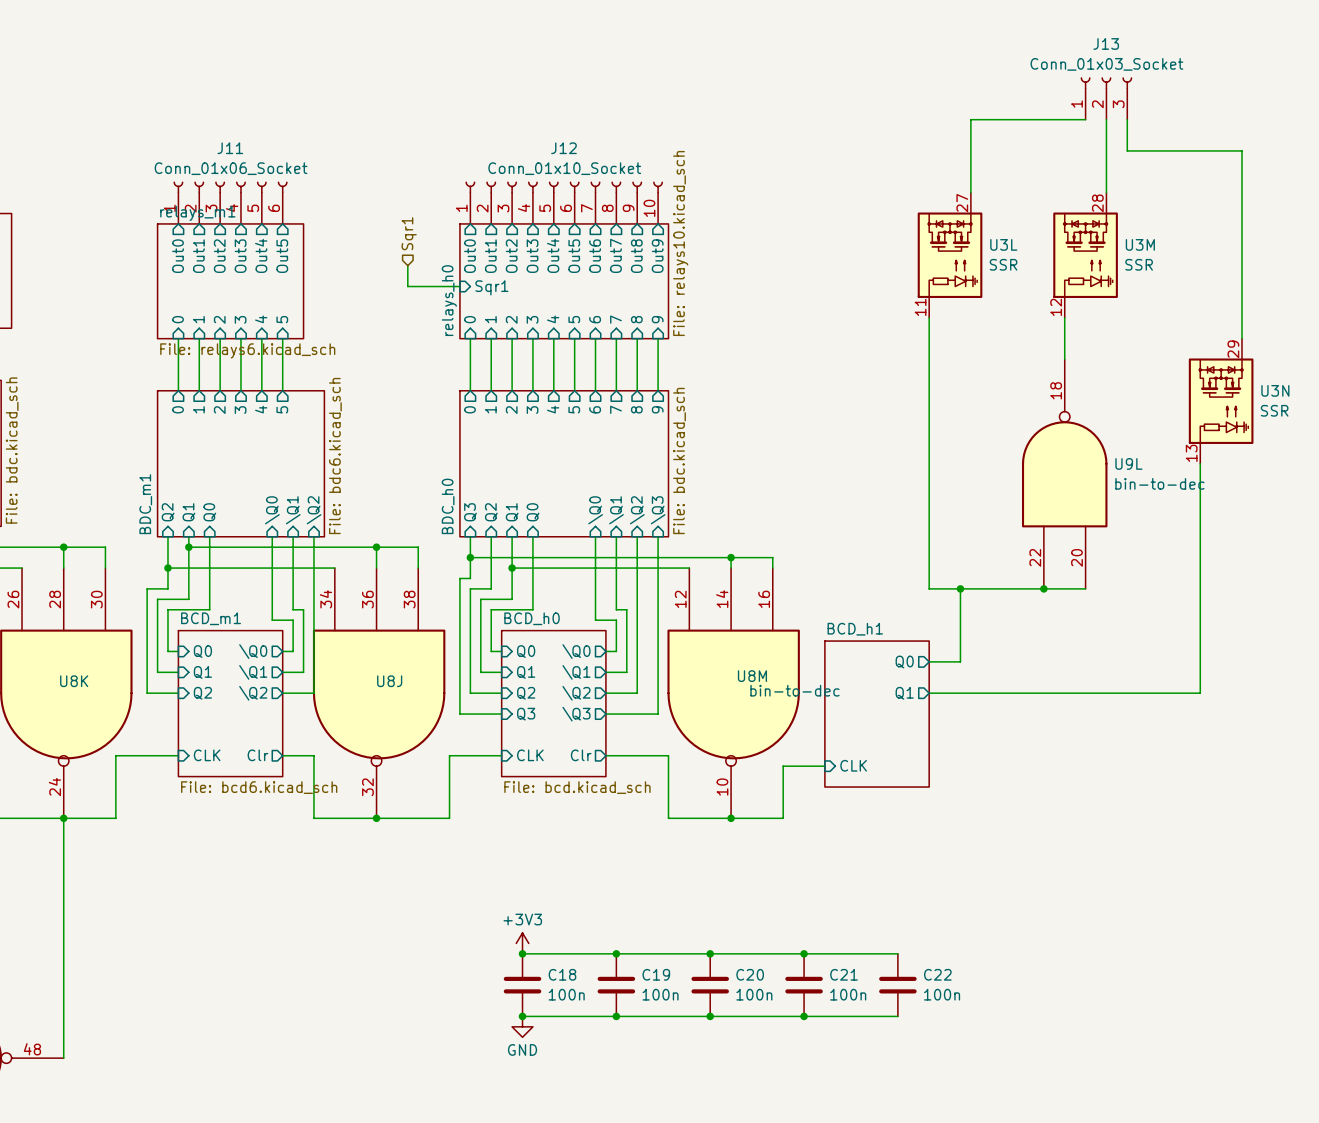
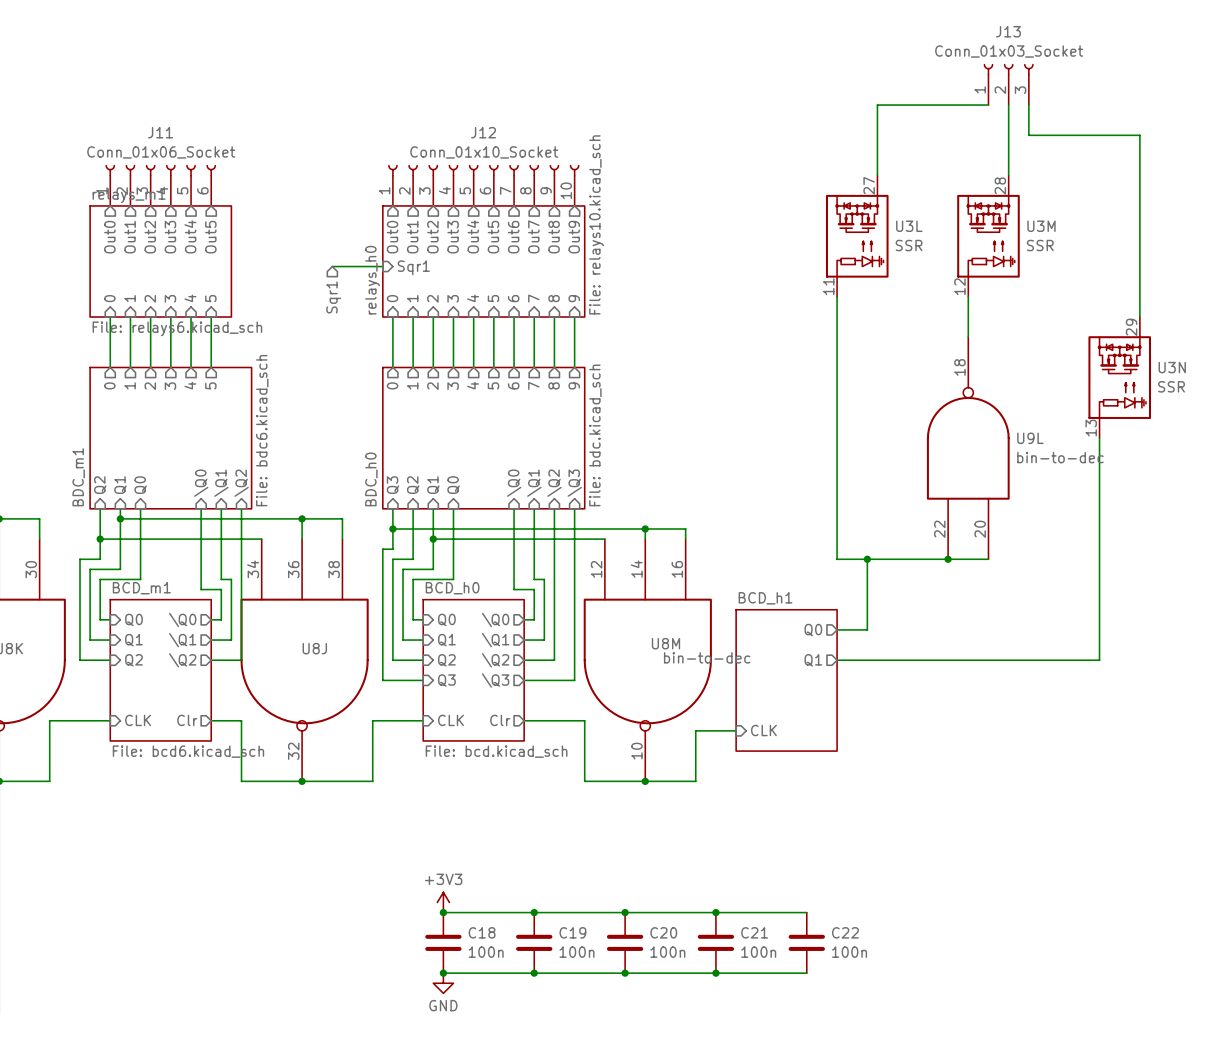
hierarchical label rotation: 0° (409, 233) -> 180° (333, 297)
hierarchical label position: Sqr1 (409, 233) -> Sqr1 (333, 297)
wire: (407, 265) (407, 286) -> none

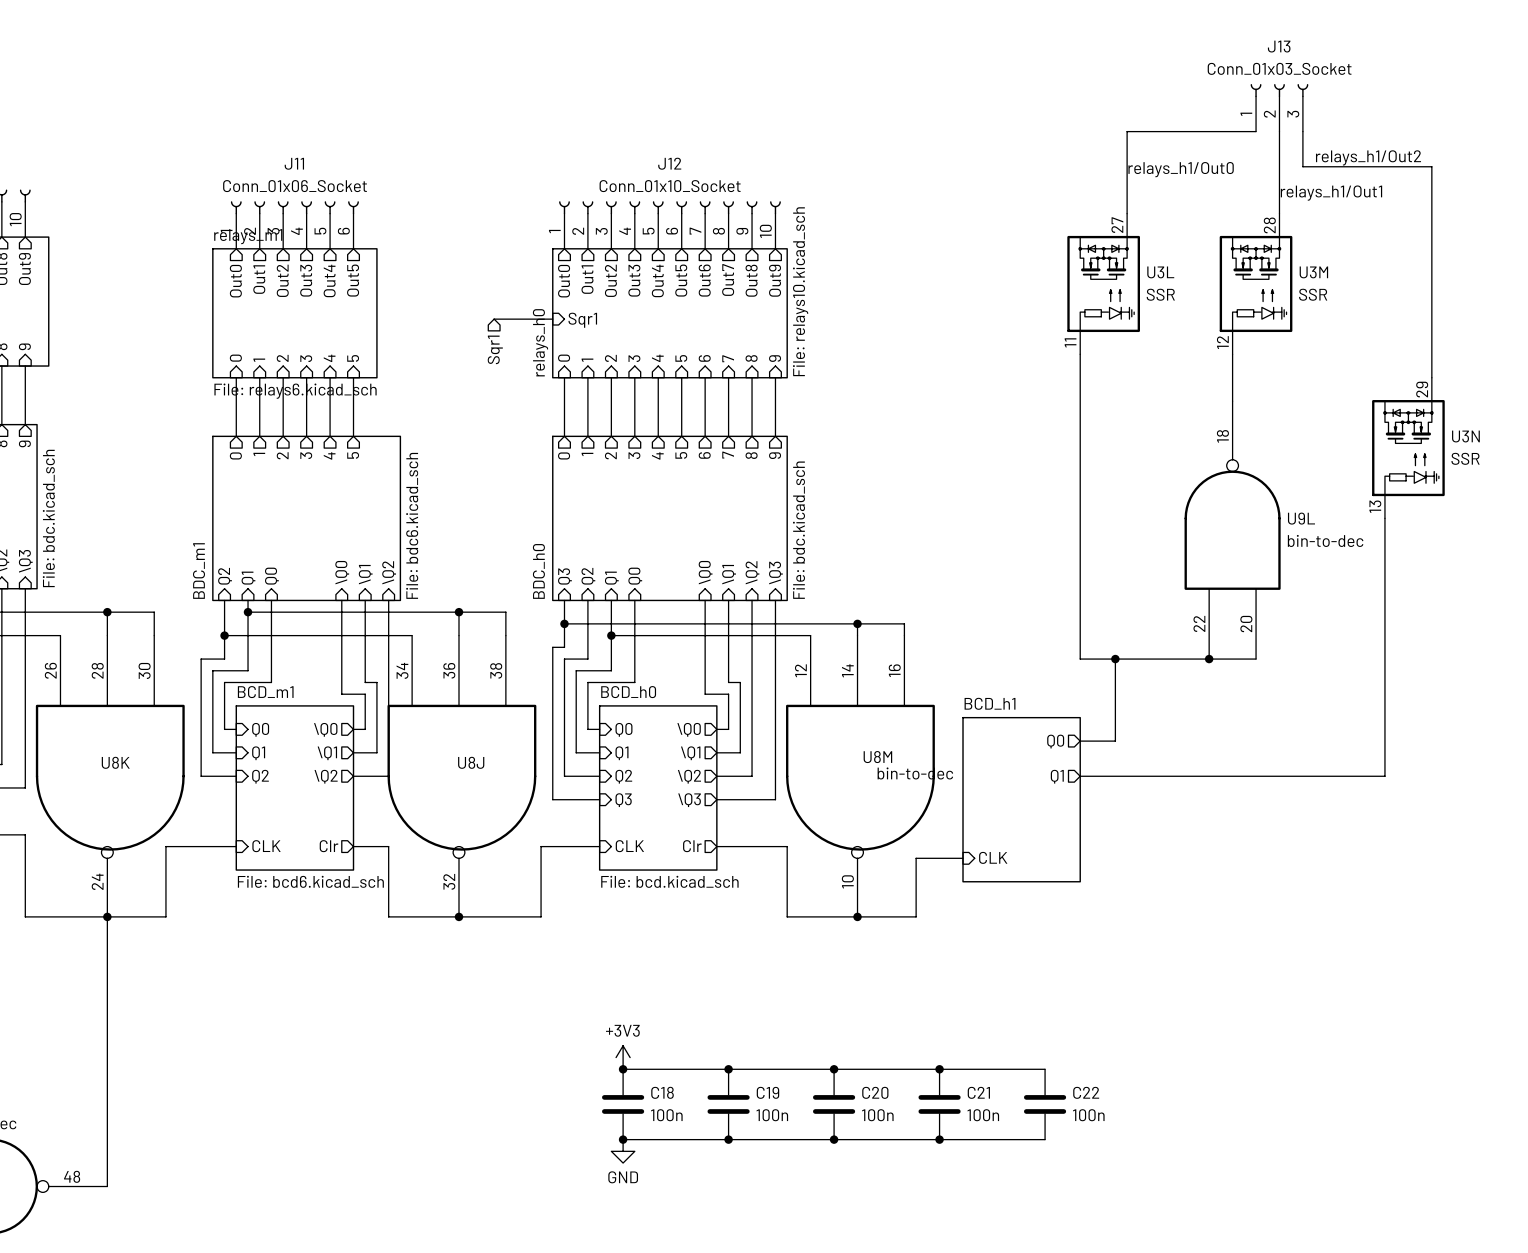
label: none -> relays_h1/Out2 (1368, 157)
label: none -> relays_h1/Out0 (1181, 169)
label: none -> relays_h1/Out1 (1331, 193)

